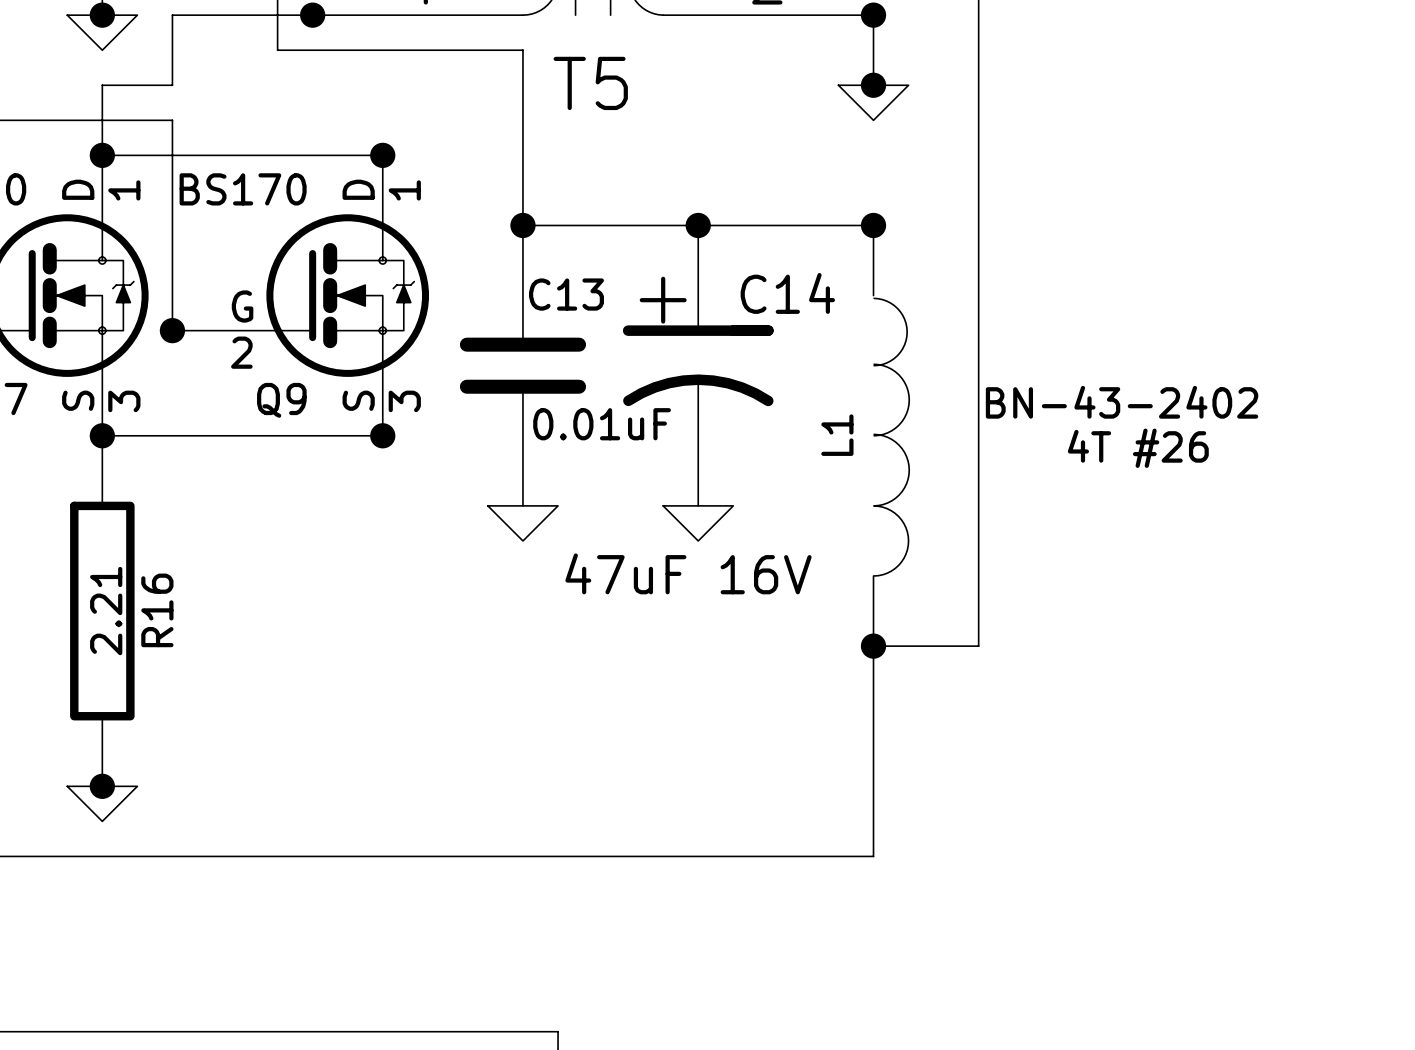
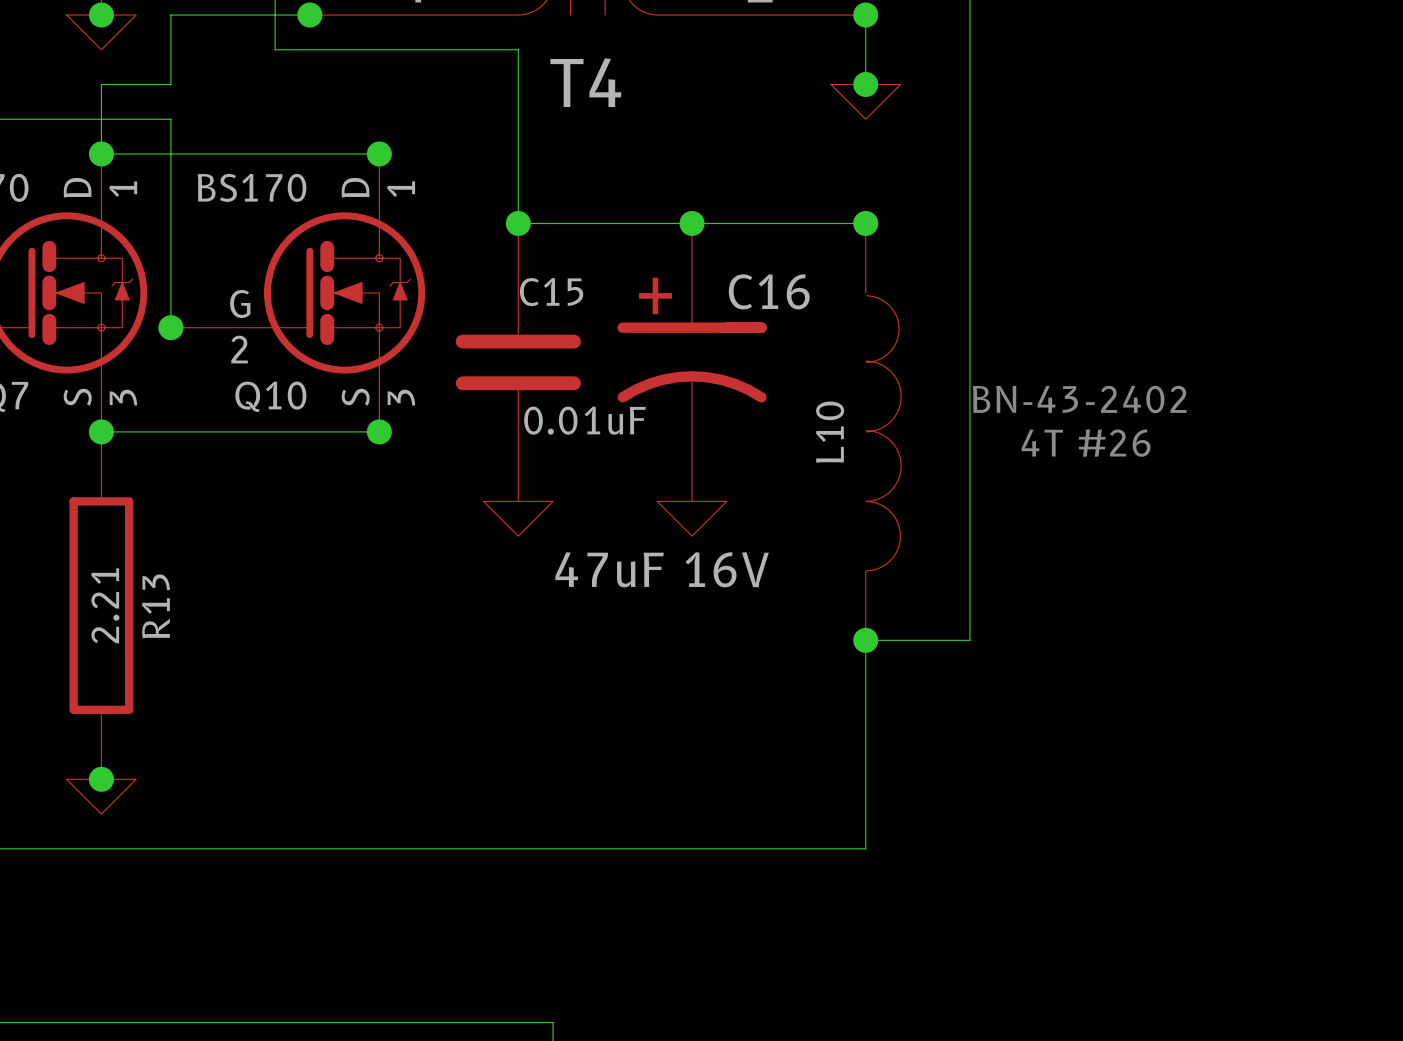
T5 name: T5 (590, 83) -> T4 (585, 82)
C14 name: C14 (787, 293) -> C16 (769, 291)
C13 name: C13 (566, 294) -> C15 (551, 292)
Q9 name: Q9 (281, 400) -> Q10 (270, 396)
L1 name: L1 (837, 435) -> L10 (830, 432)
R16 name: R16 (157, 610) -> R13 (155, 606)

